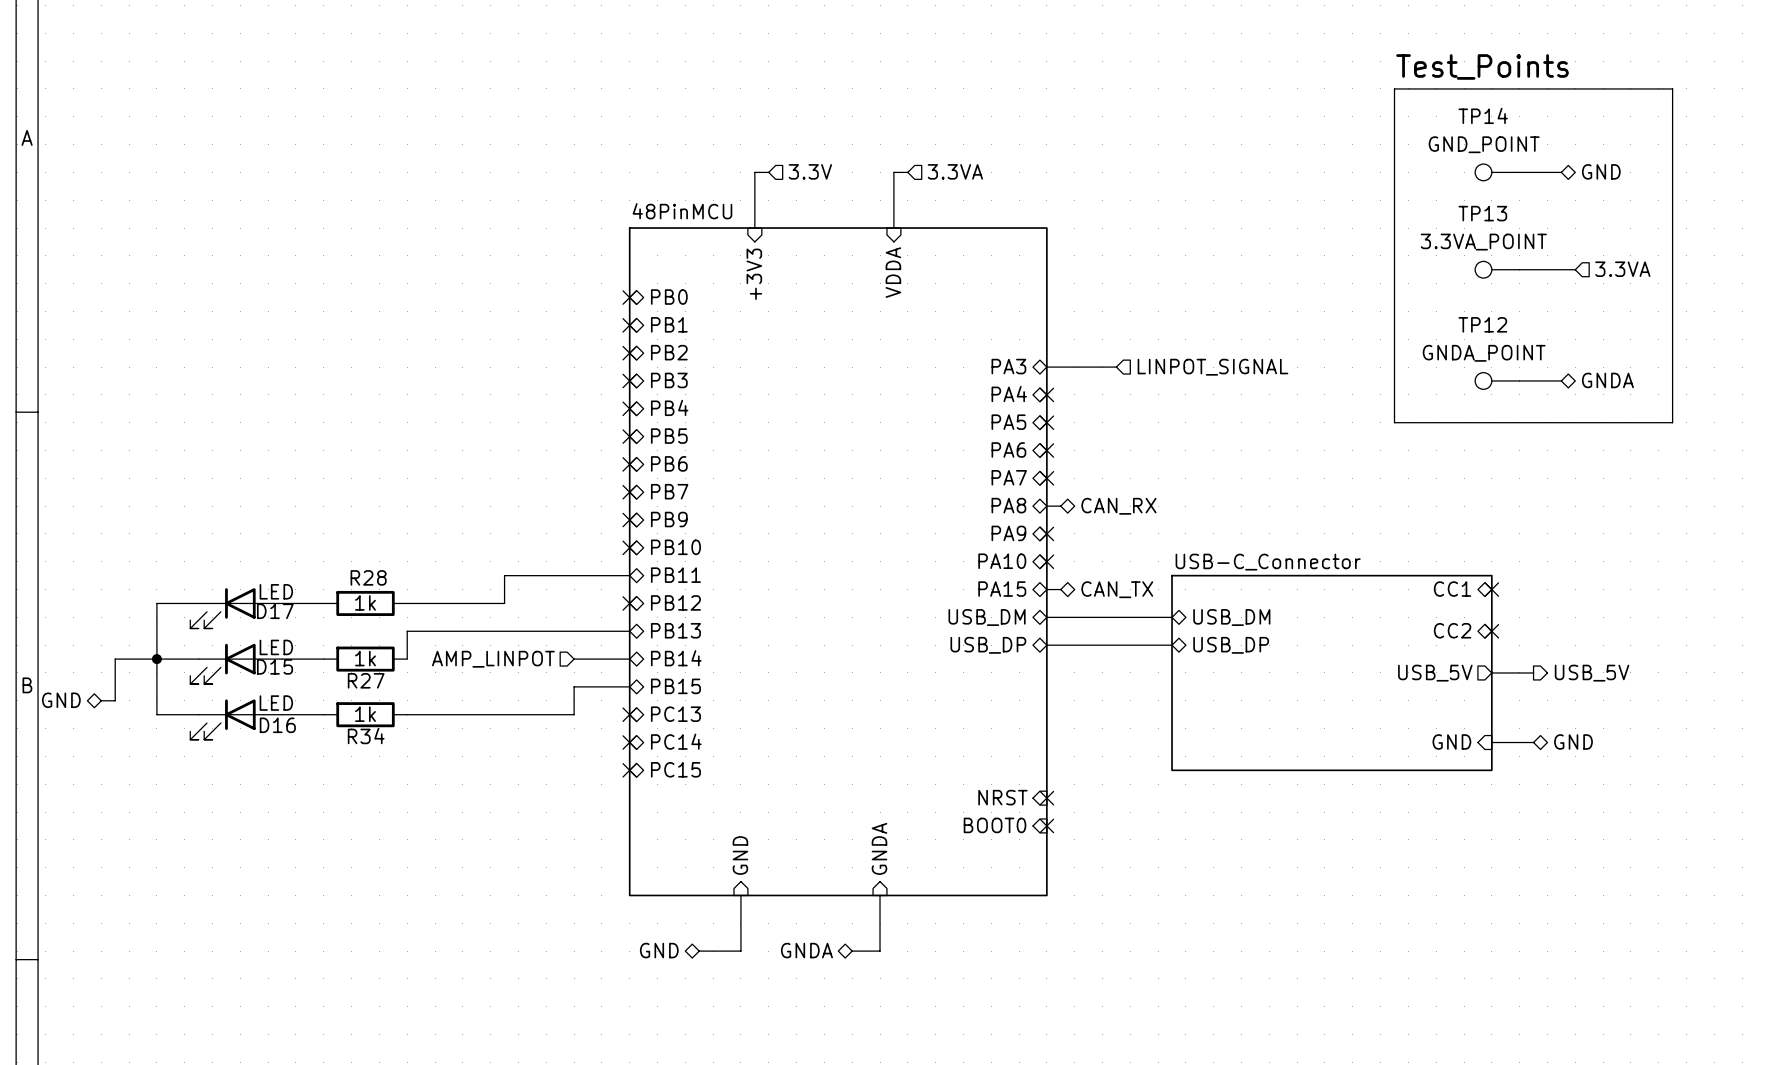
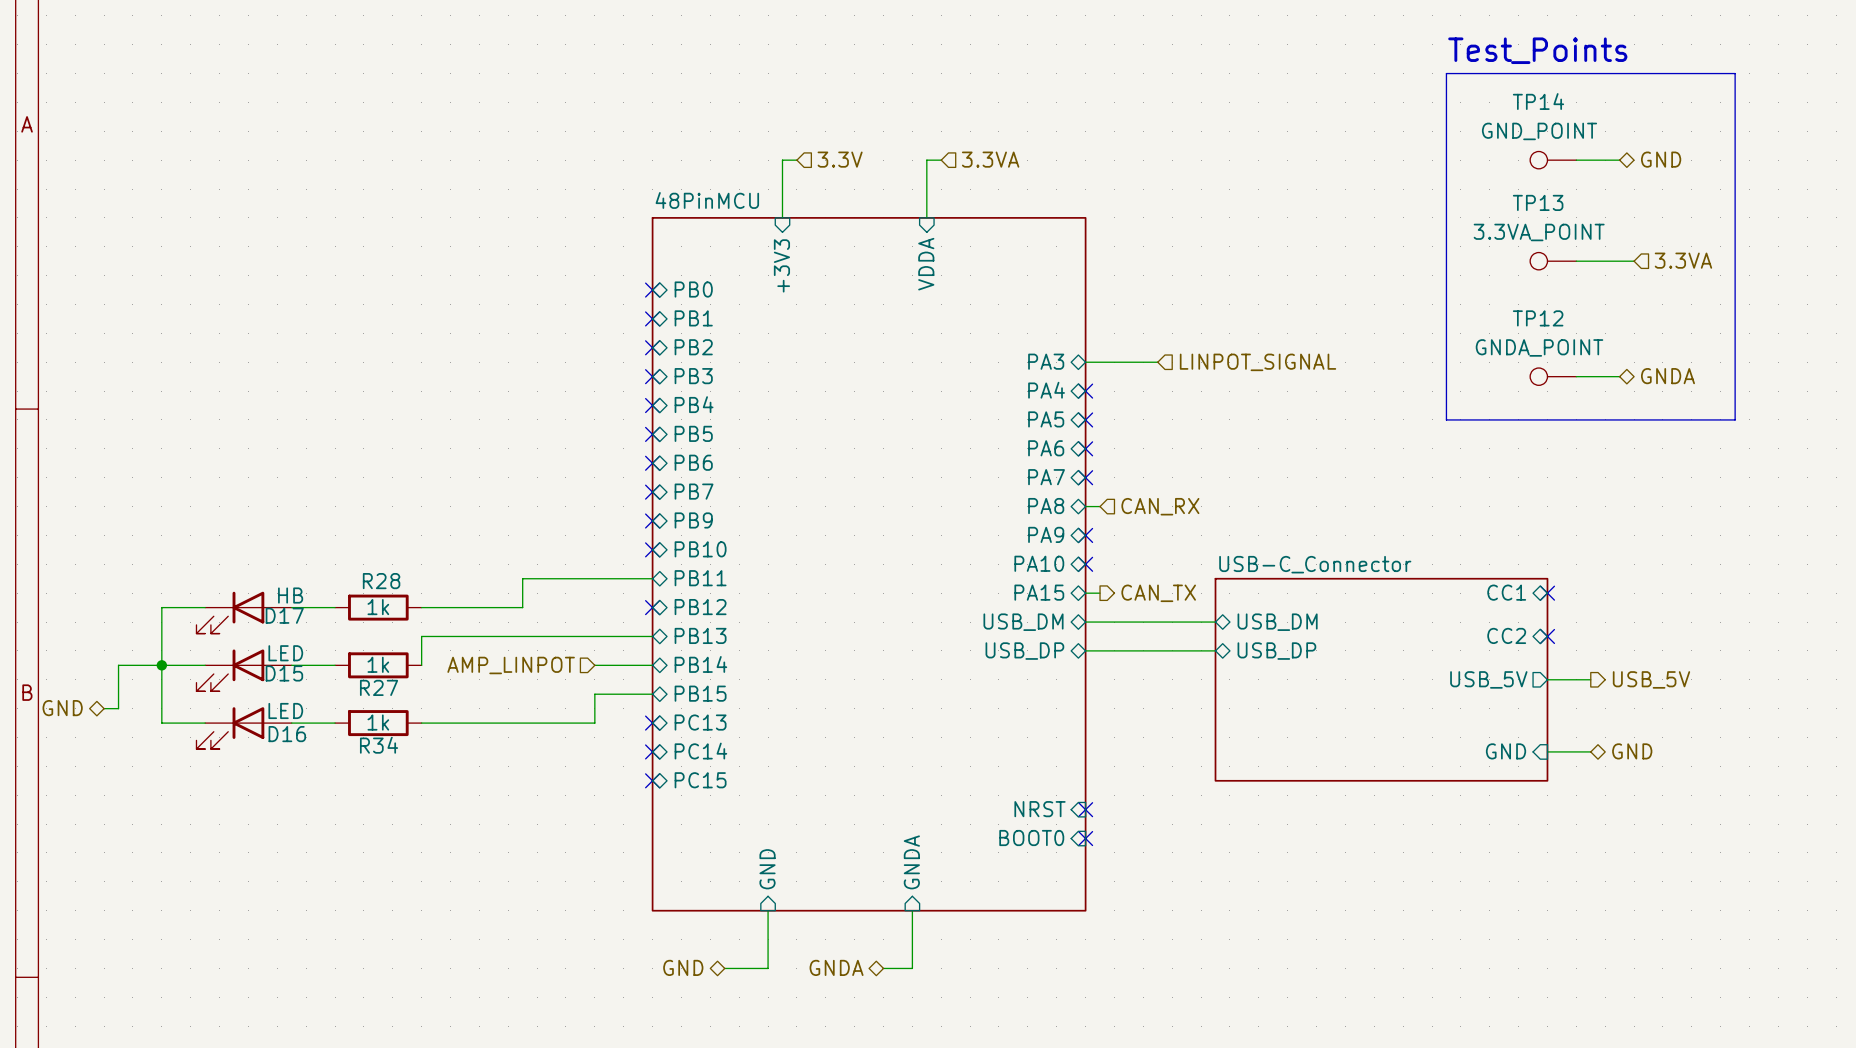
hierarchical label shape: bidirectional (1118, 506) -> input (1160, 506)
hierarchical label shape: bidirectional (1117, 589) -> output (1158, 593)
D17 value: LED (276, 591) -> HB (290, 595)

